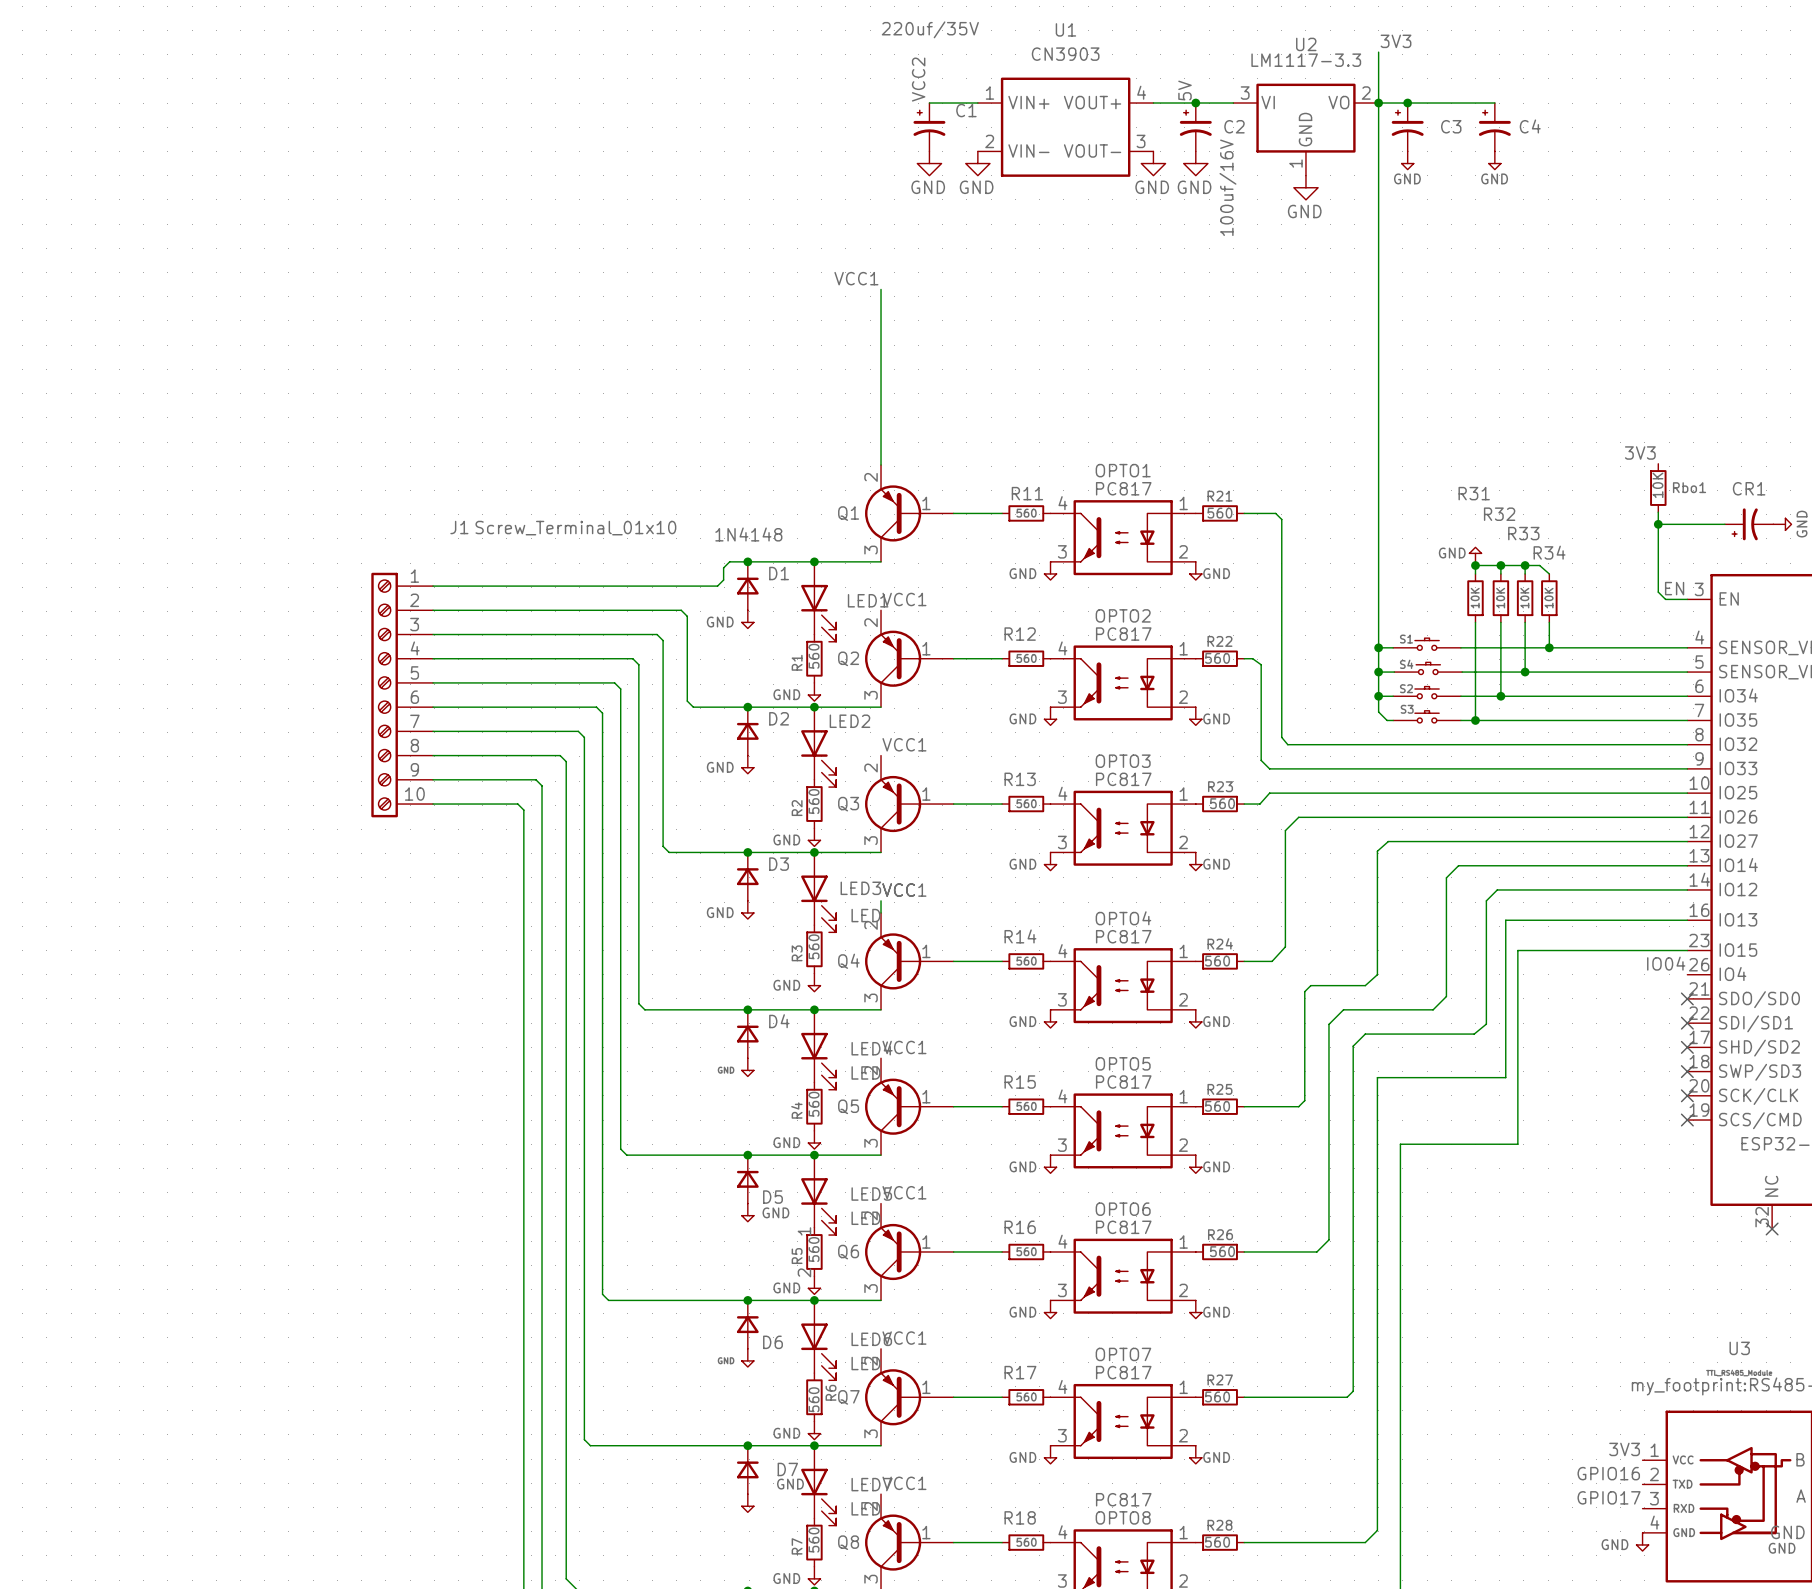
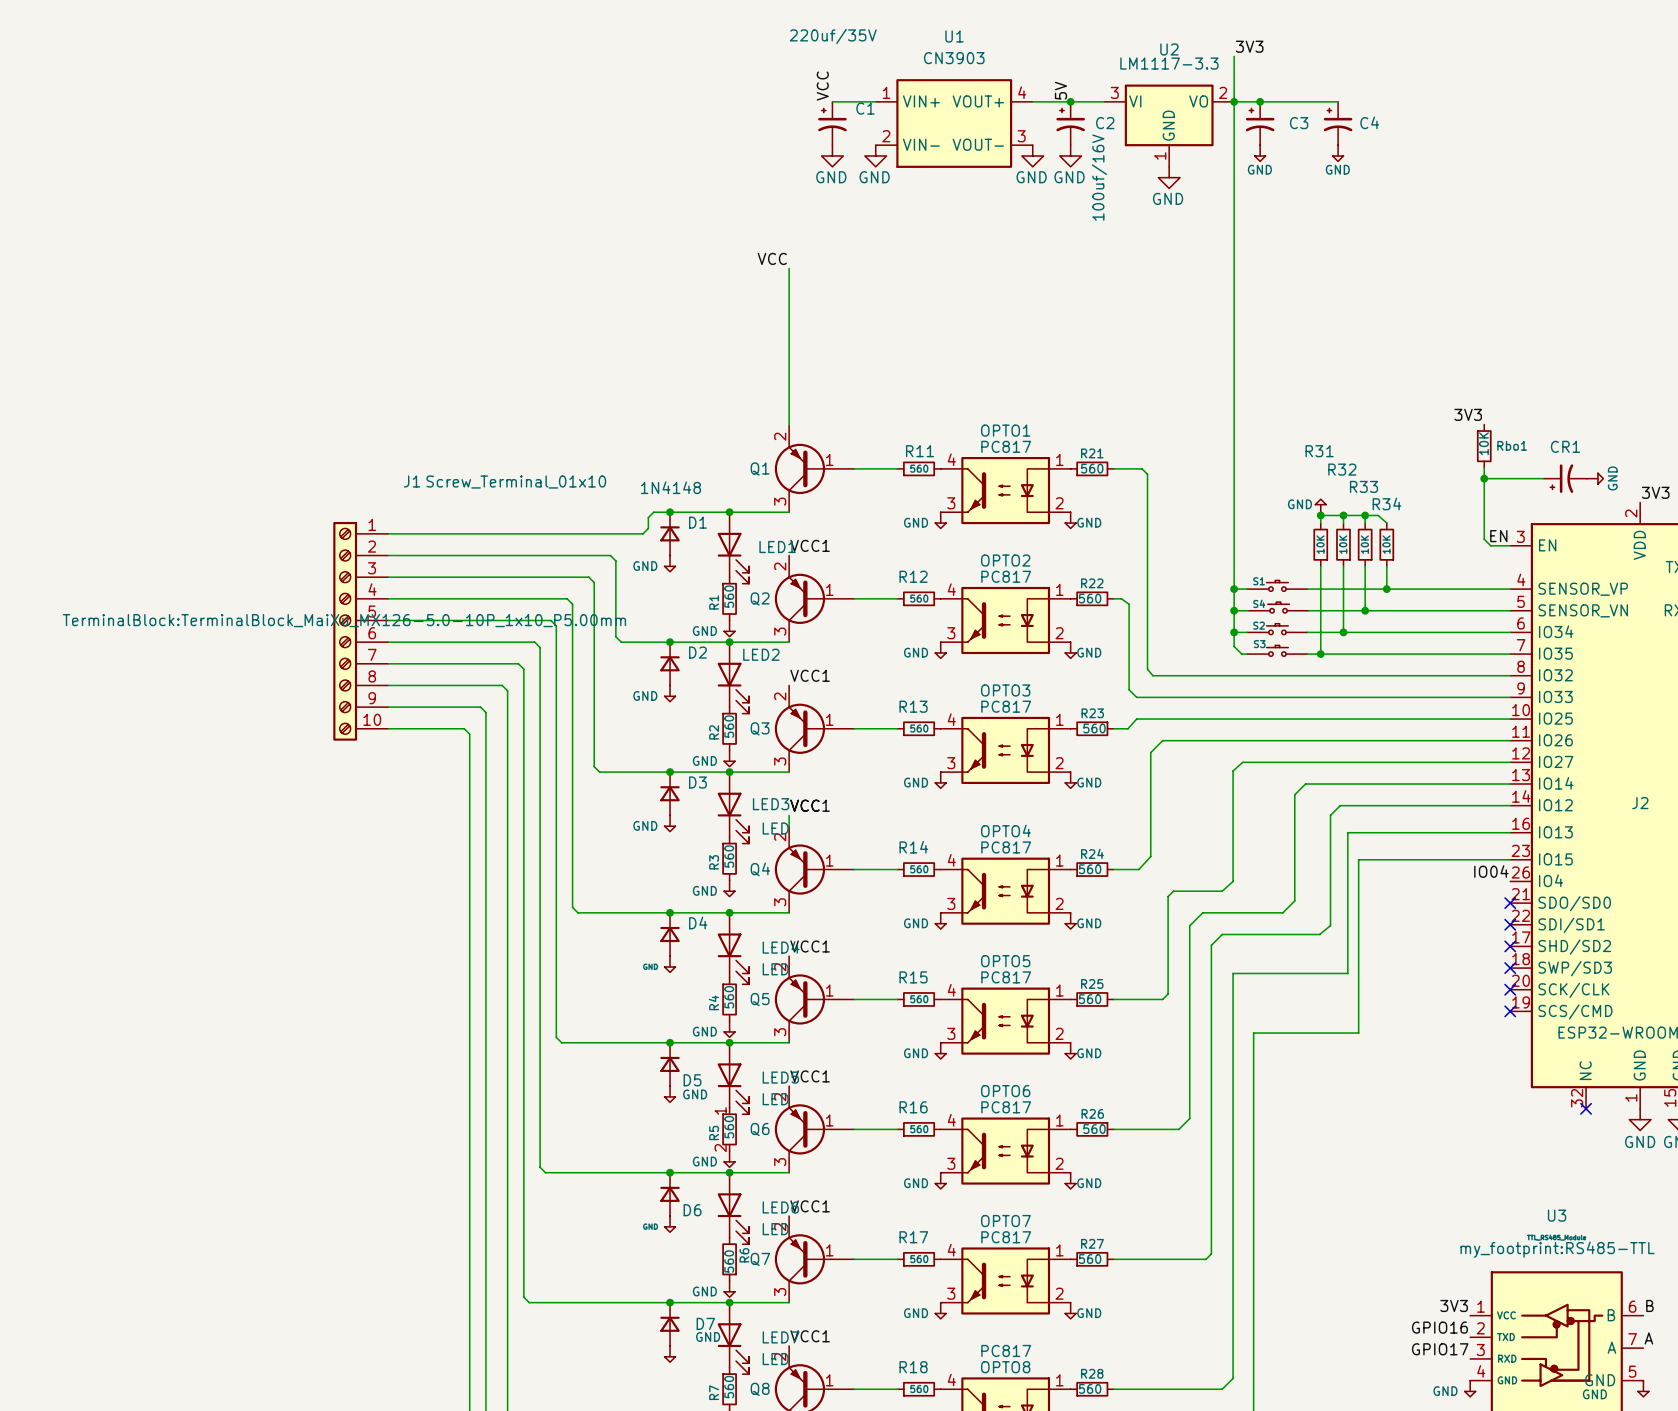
label: VCC2 (918, 79) -> VCC (822, 86)
label: VCC1 (856, 278) -> VCC (772, 258)
J1 text: none -> TerminalBlock:TerminalBlock_MaiXu_MX126-5.0-10P_1x10_P5.00mm (344, 620)

